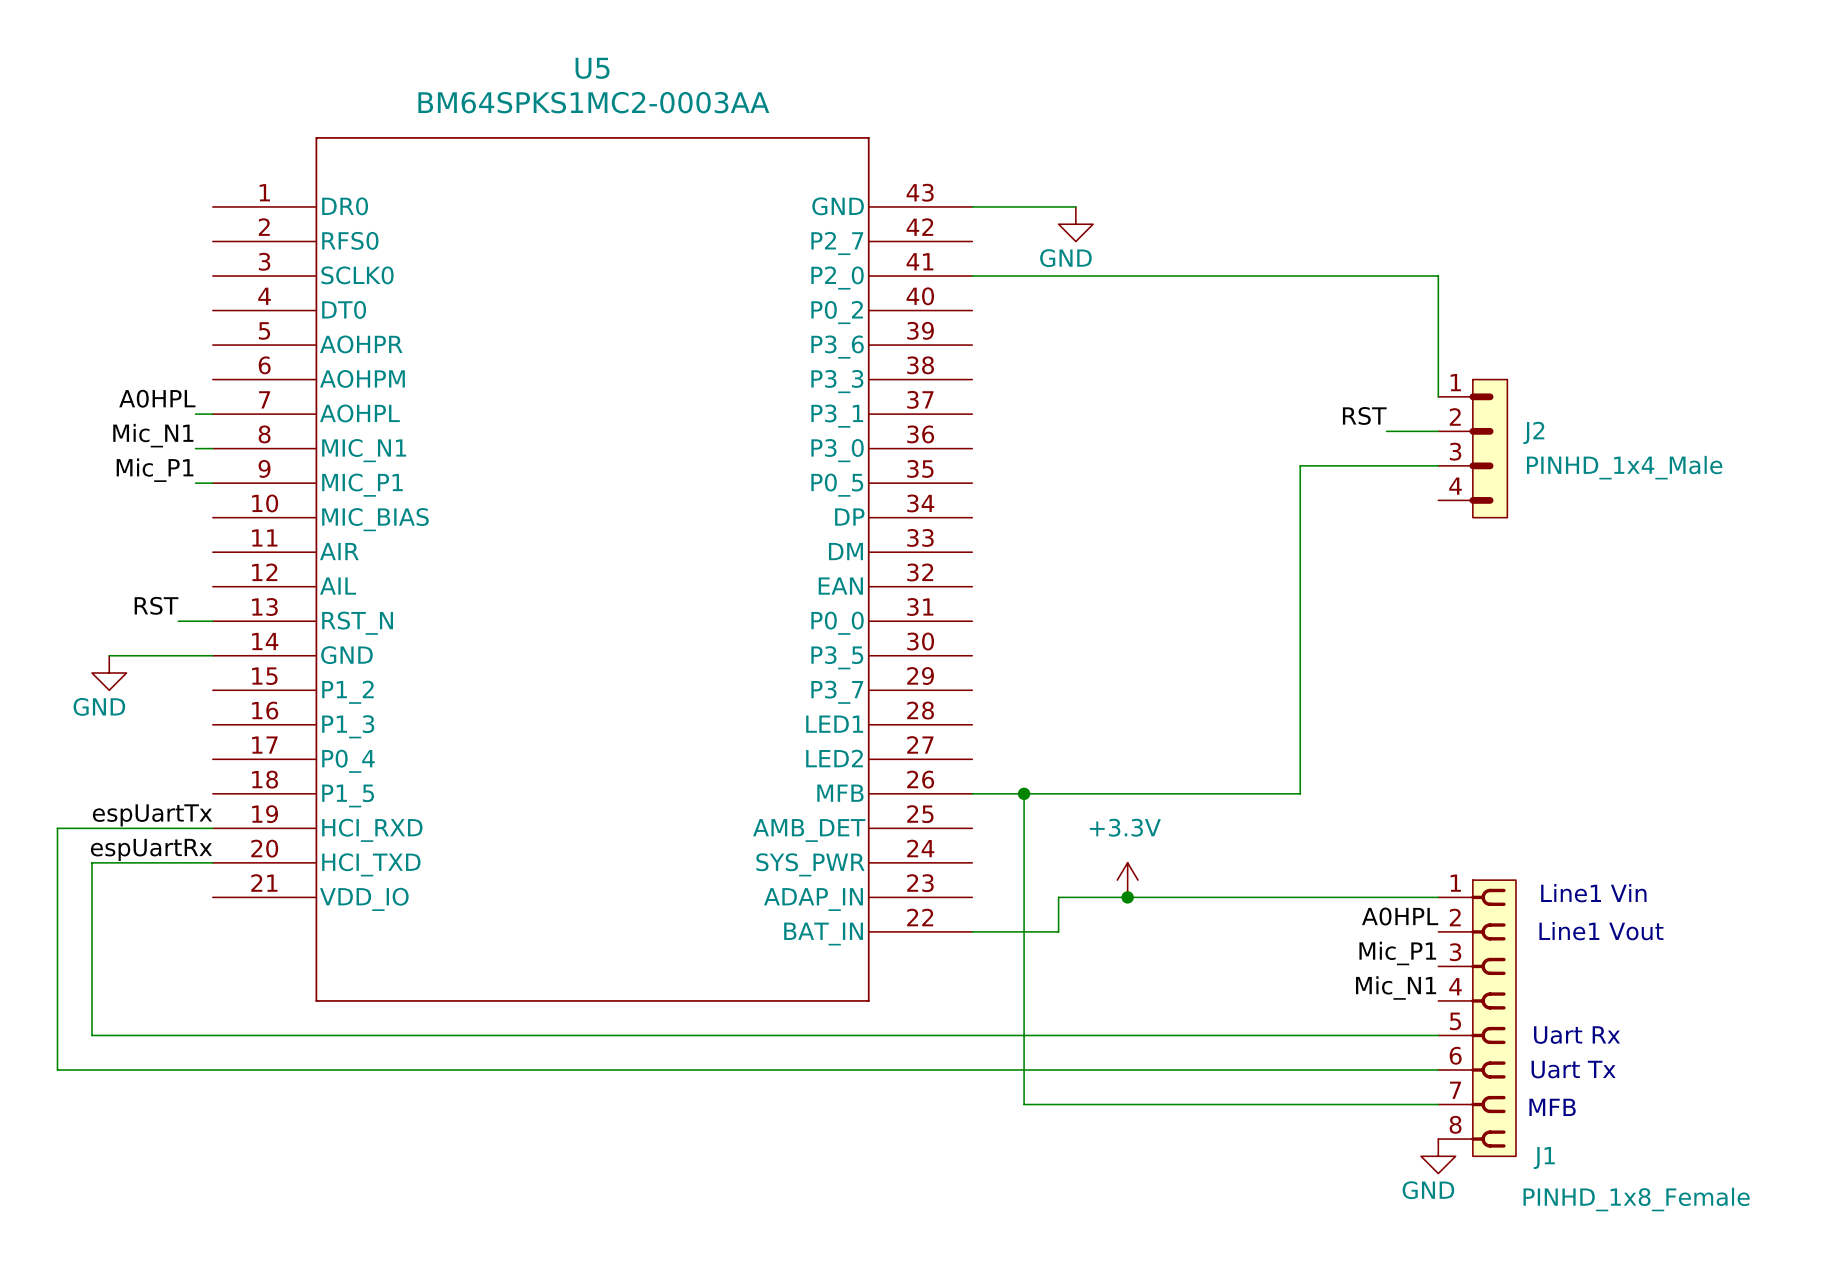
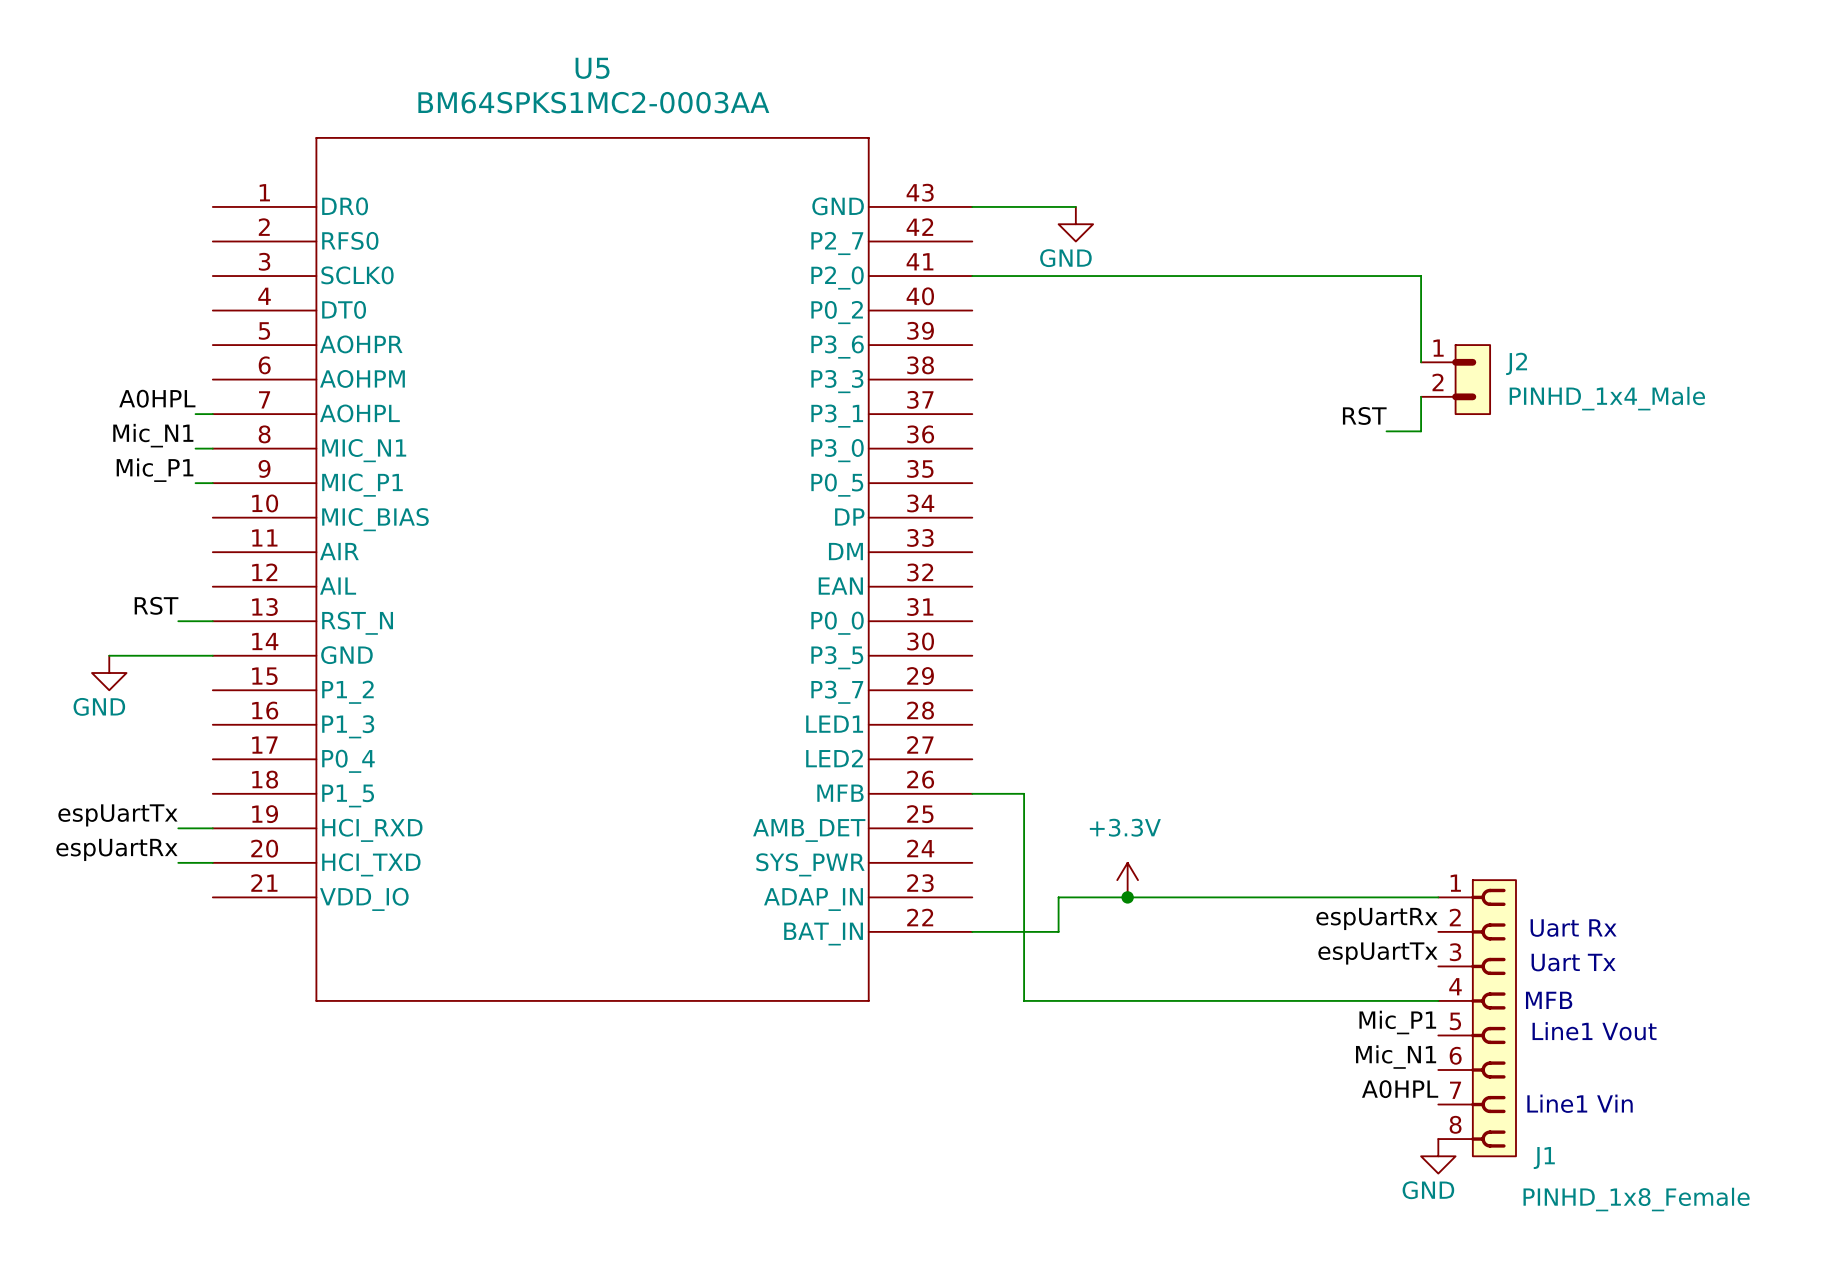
wire: (1421, 276) (1438, 276) (1438, 396) -> (1421, 276) (1421, 362)
J2 symbol: [1438, 379, 1508, 518] -> [1421, 345, 1491, 415]
wire: (1421, 431) (1438, 431) -> (1421, 431) (1421, 396)
wire: (1438, 465) (1300, 465) (1300, 793) (1024, 793) -> none
junction: (1024, 793) -> none
label position: espUartTx (152, 815) -> espUartTx (117, 815)
wire: (178, 828) (57, 828) (57, 1070) (1438, 1070) -> none
label position: espUartRx (151, 849) -> espUartRx (116, 849)
wire: (178, 862) (92, 862) (92, 1035) (1438, 1035) -> none
text position: Line1 Vin (1593, 893) -> Line1 Vin (1580, 1103)
label: A0HPL (1400, 916) -> espUartRx (1376, 918)
text position: Line1 Vout (1601, 931) -> Line1 Vout (1594, 1031)
label: Mic_P1 (1397, 953) -> espUartTx (1377, 953)
label position: Mic_N1 (1396, 987) -> Mic_N1 (1396, 1057)
wire: (1024, 1000) (1024, 1104) (1438, 1104) -> (1024, 1000) (1438, 1000)
label: none -> Mic_P1 (1397, 1022)
text position: Uart Rx (1577, 1035) -> Uart Rx (1573, 928)
text position: Uart Tx (1573, 1069) -> Uart Tx (1573, 962)
label: none -> A0HPL (1400, 1089)
text position: MFB (1552, 1107) -> MFB (1549, 1000)

